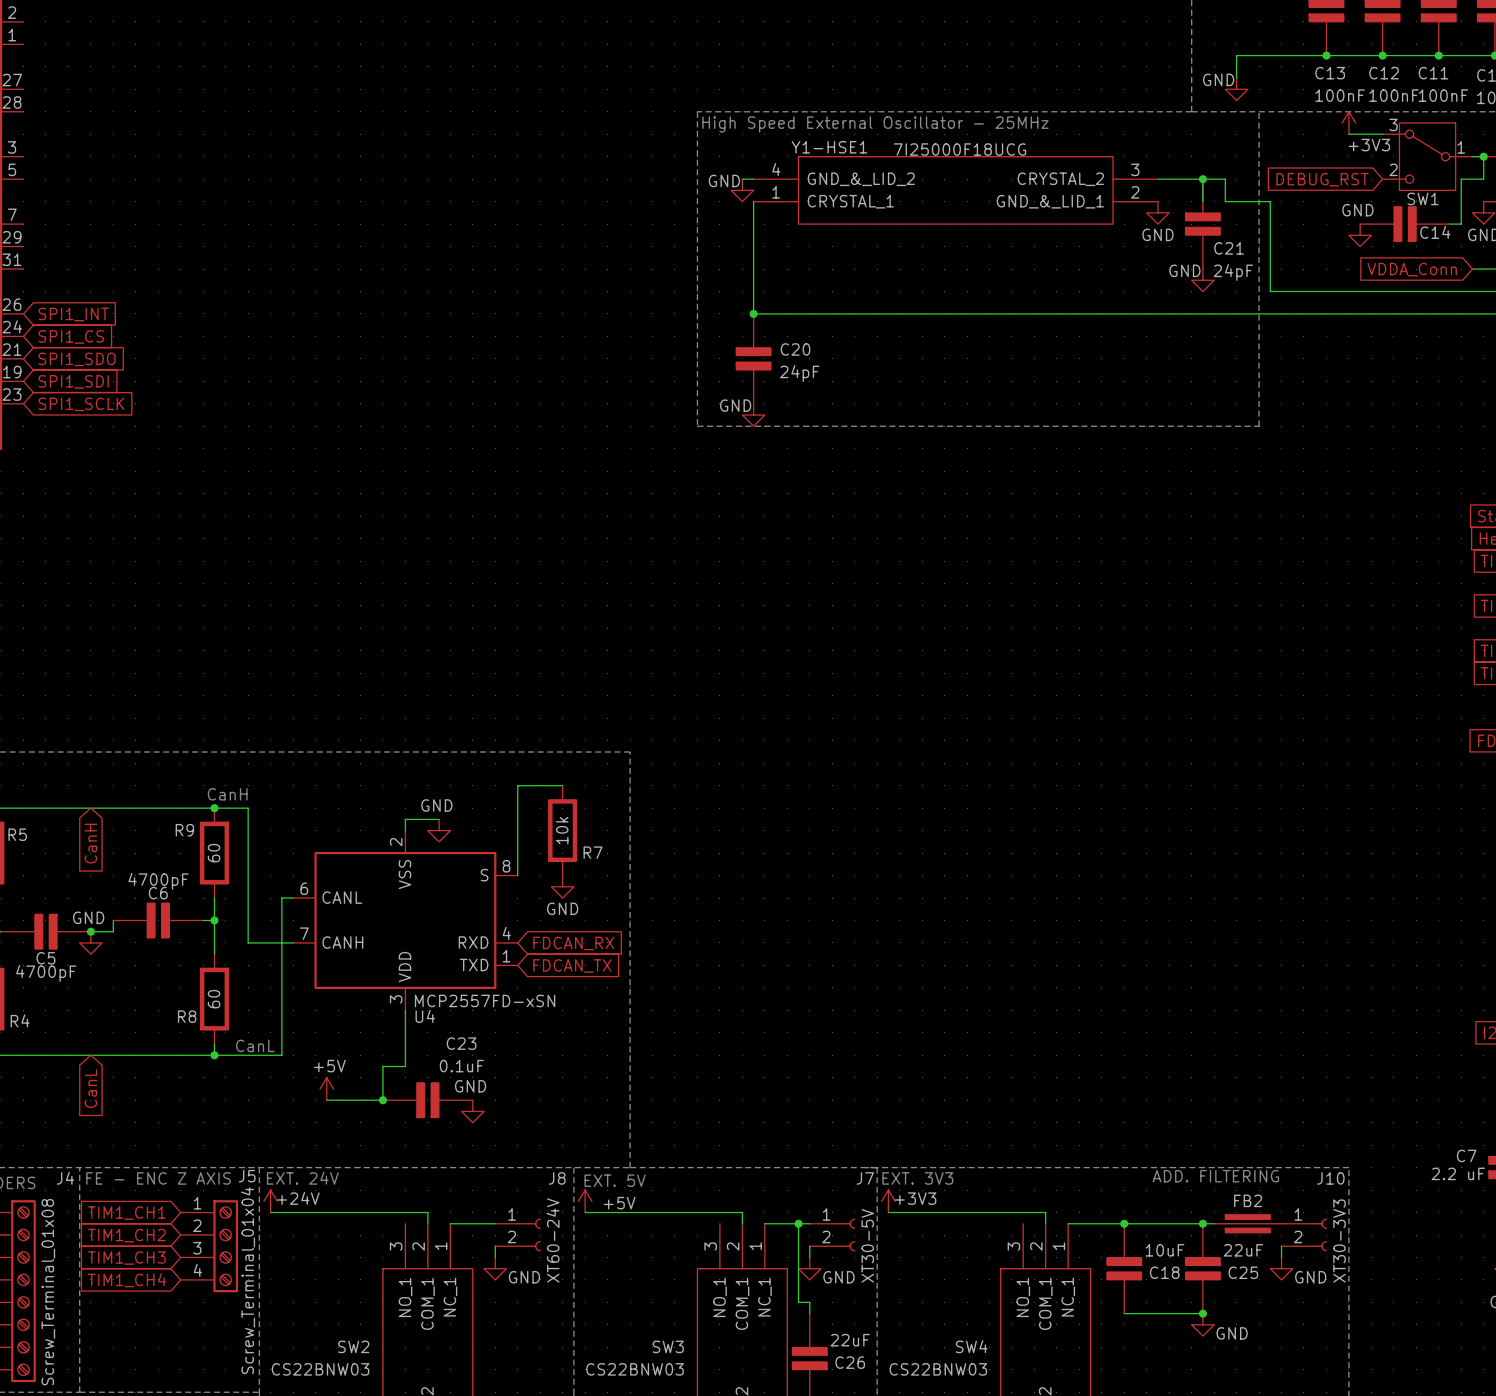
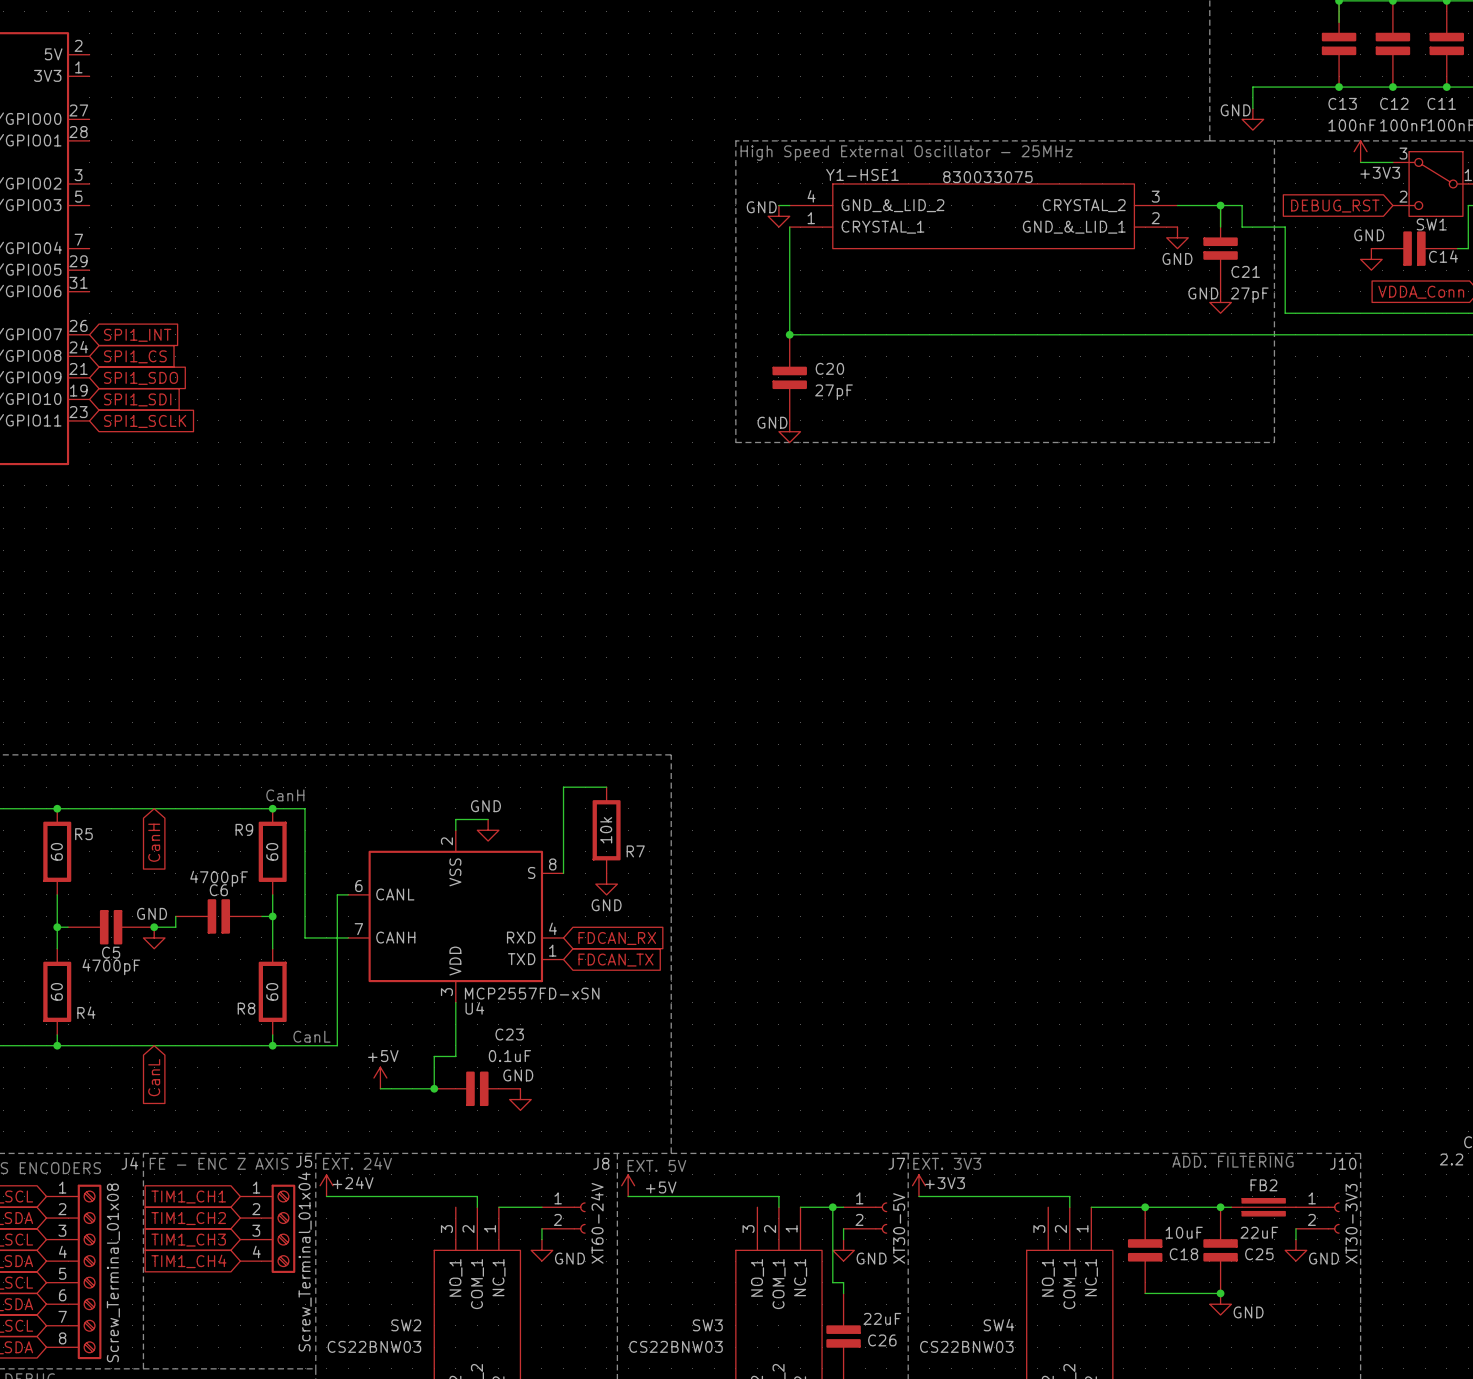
Y1-HSE1 value: 7I25000F18UCG (960, 149) -> 830033075 (987, 177)
C21 value: 24pF (1233, 272) -> 27pF (1249, 295)
C20 value: 24pF (799, 373) -> 27pF (834, 392)

